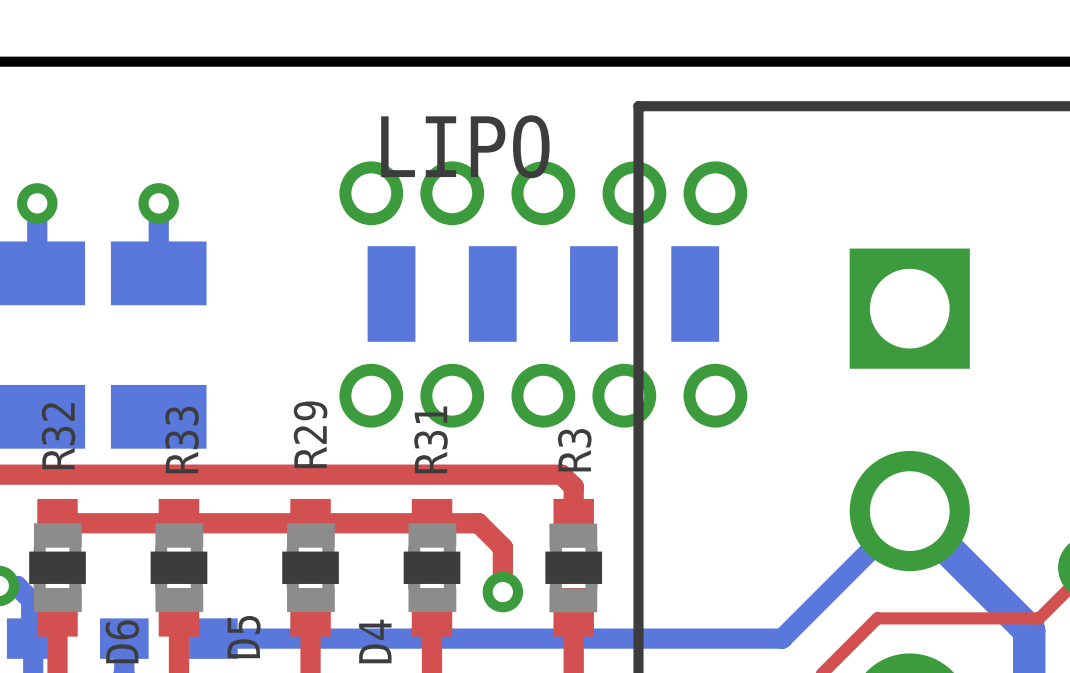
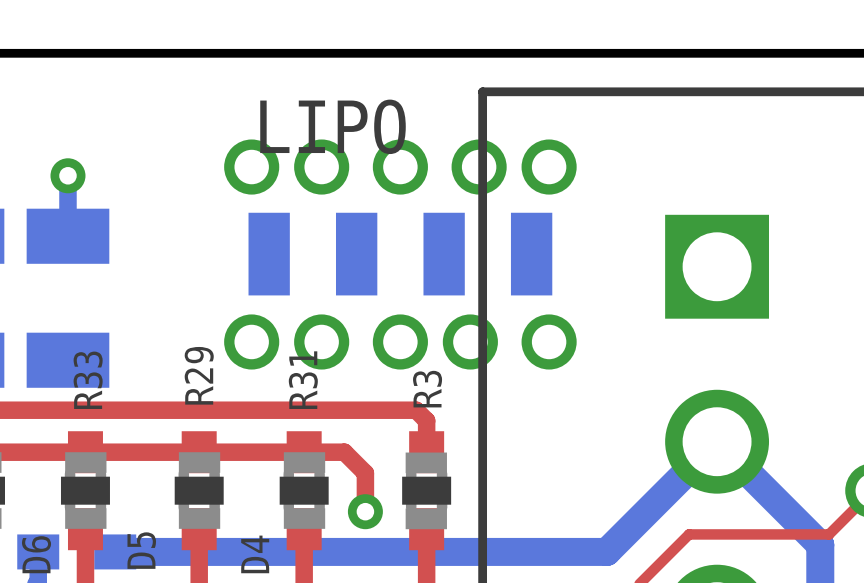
bottom track width: thin (909, 511) (782, 638) (213, 638) -> thick (717, 441) (606, 551) (115, 551)

